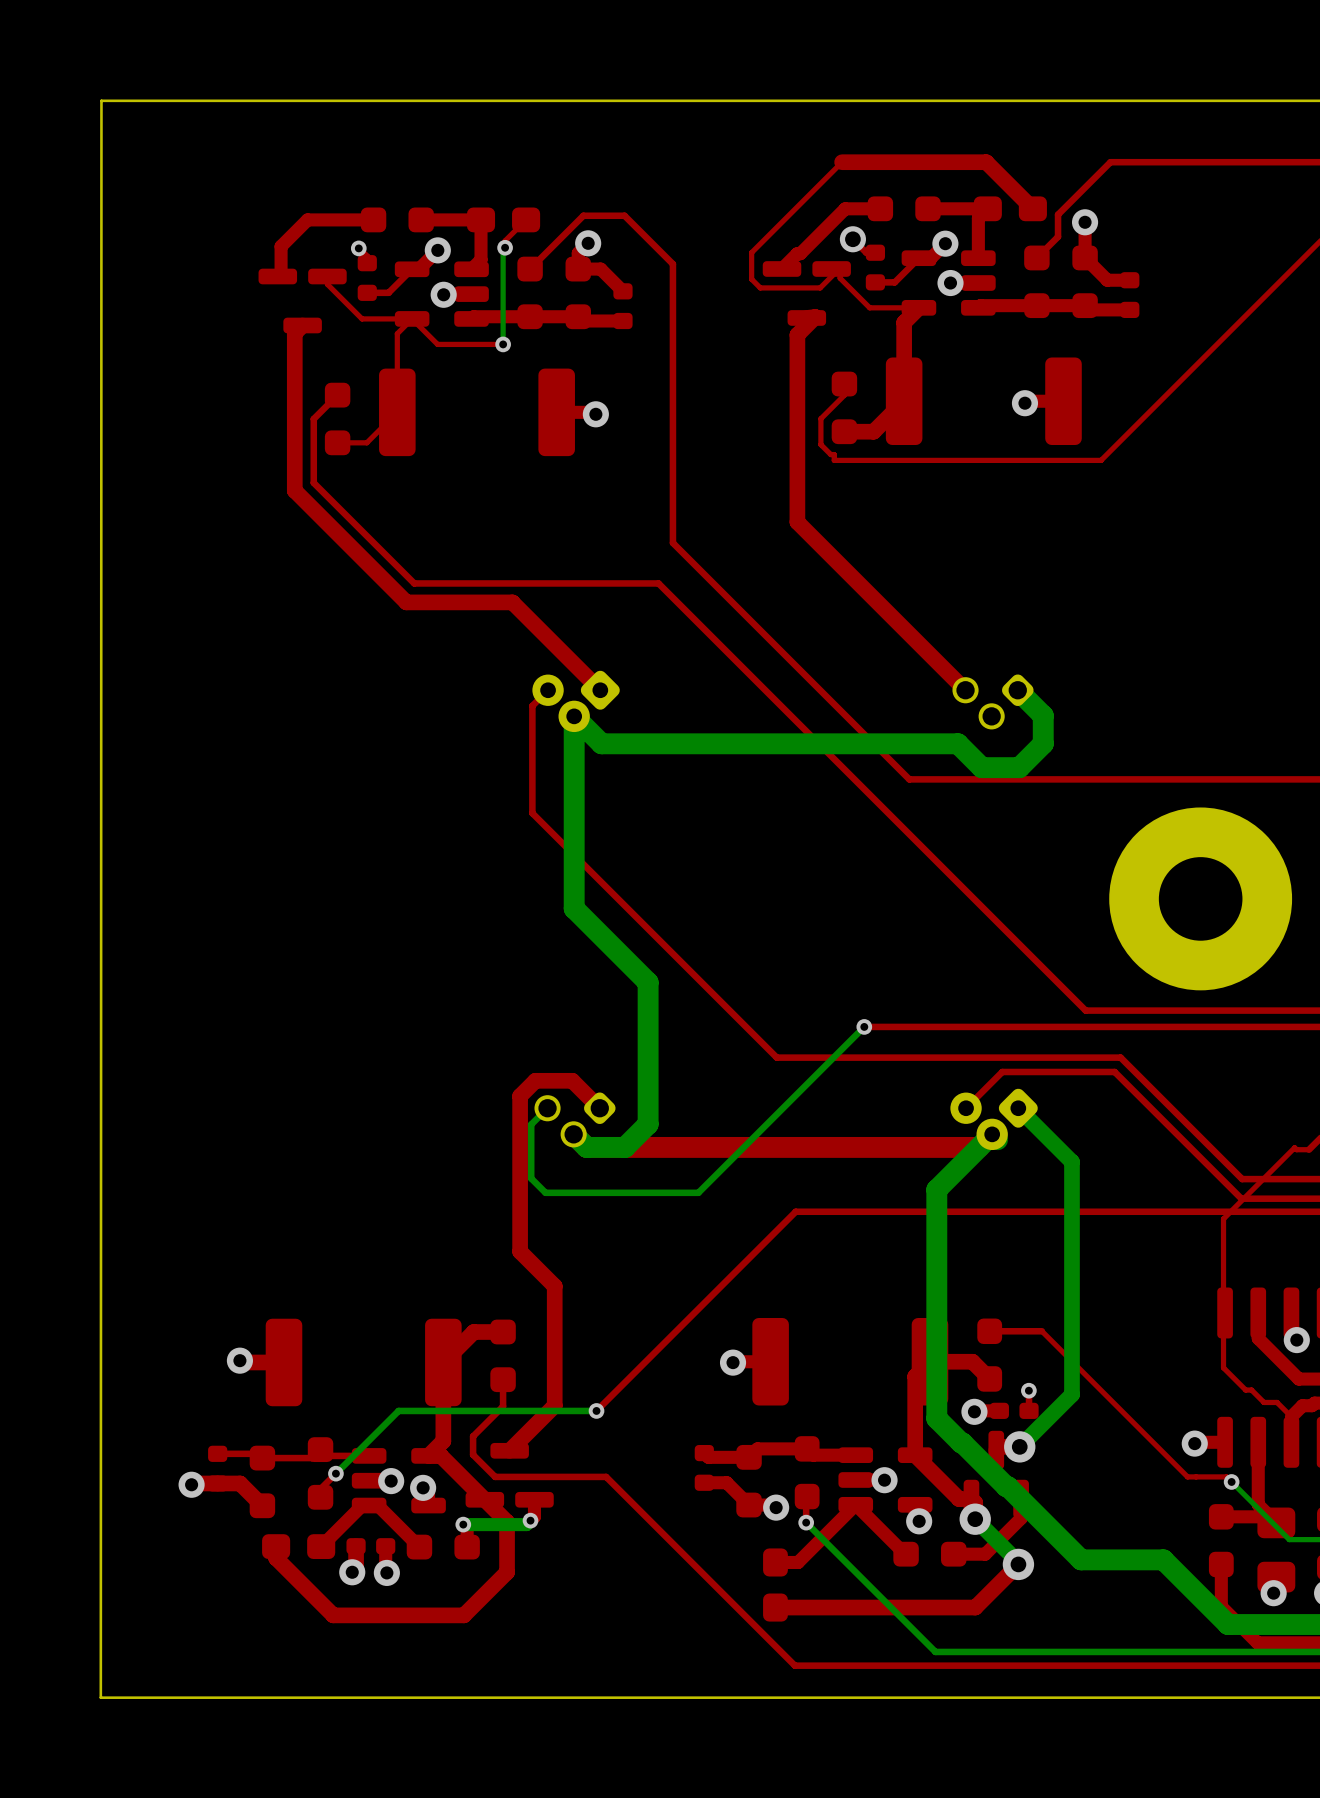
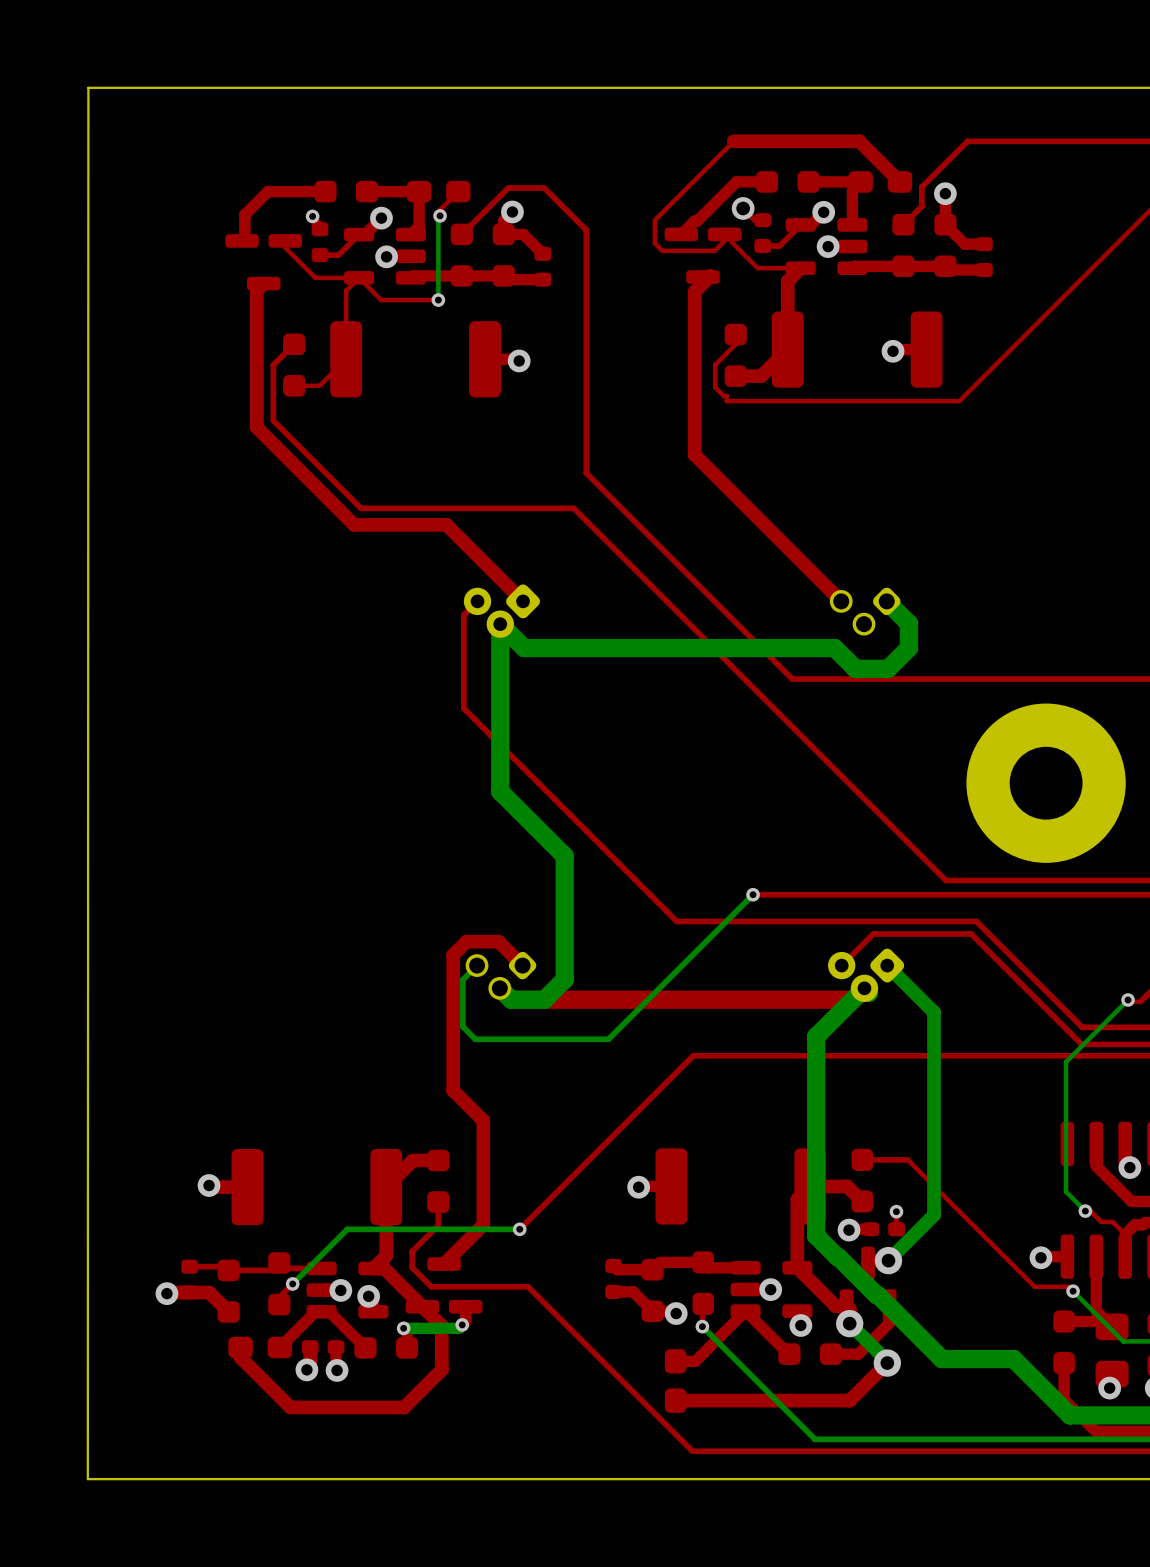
top track: (1294, 1147) (1223, 1218) (1223, 1367) (1245, 1390) -> none
bottom track: none -> (1128, 1000) (1066, 1062) (1066, 1191) (1085, 1211)
via: none -> (1128, 1000)
via: none -> (1085, 1211)

